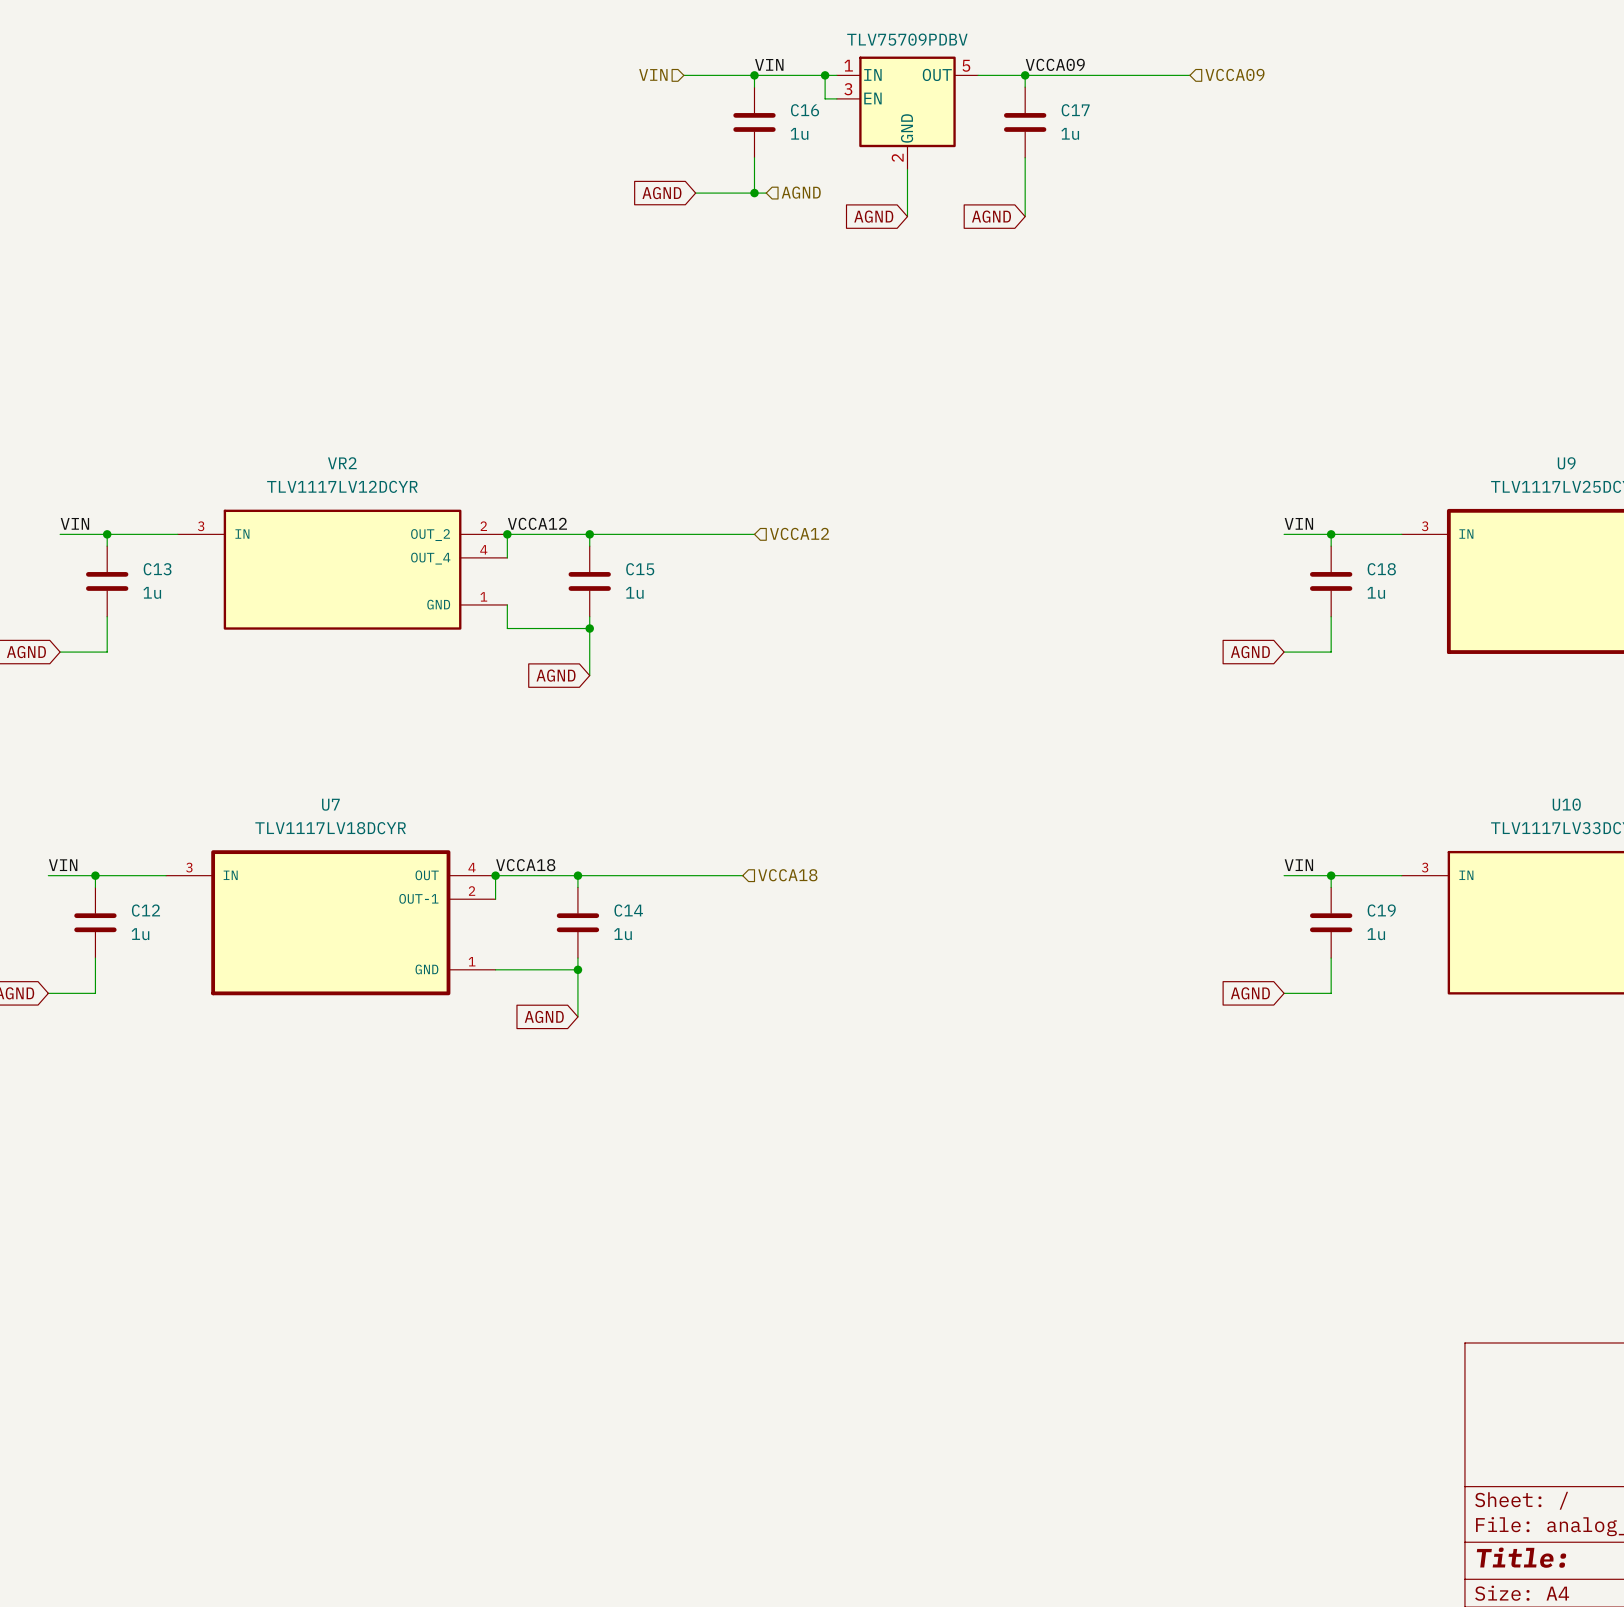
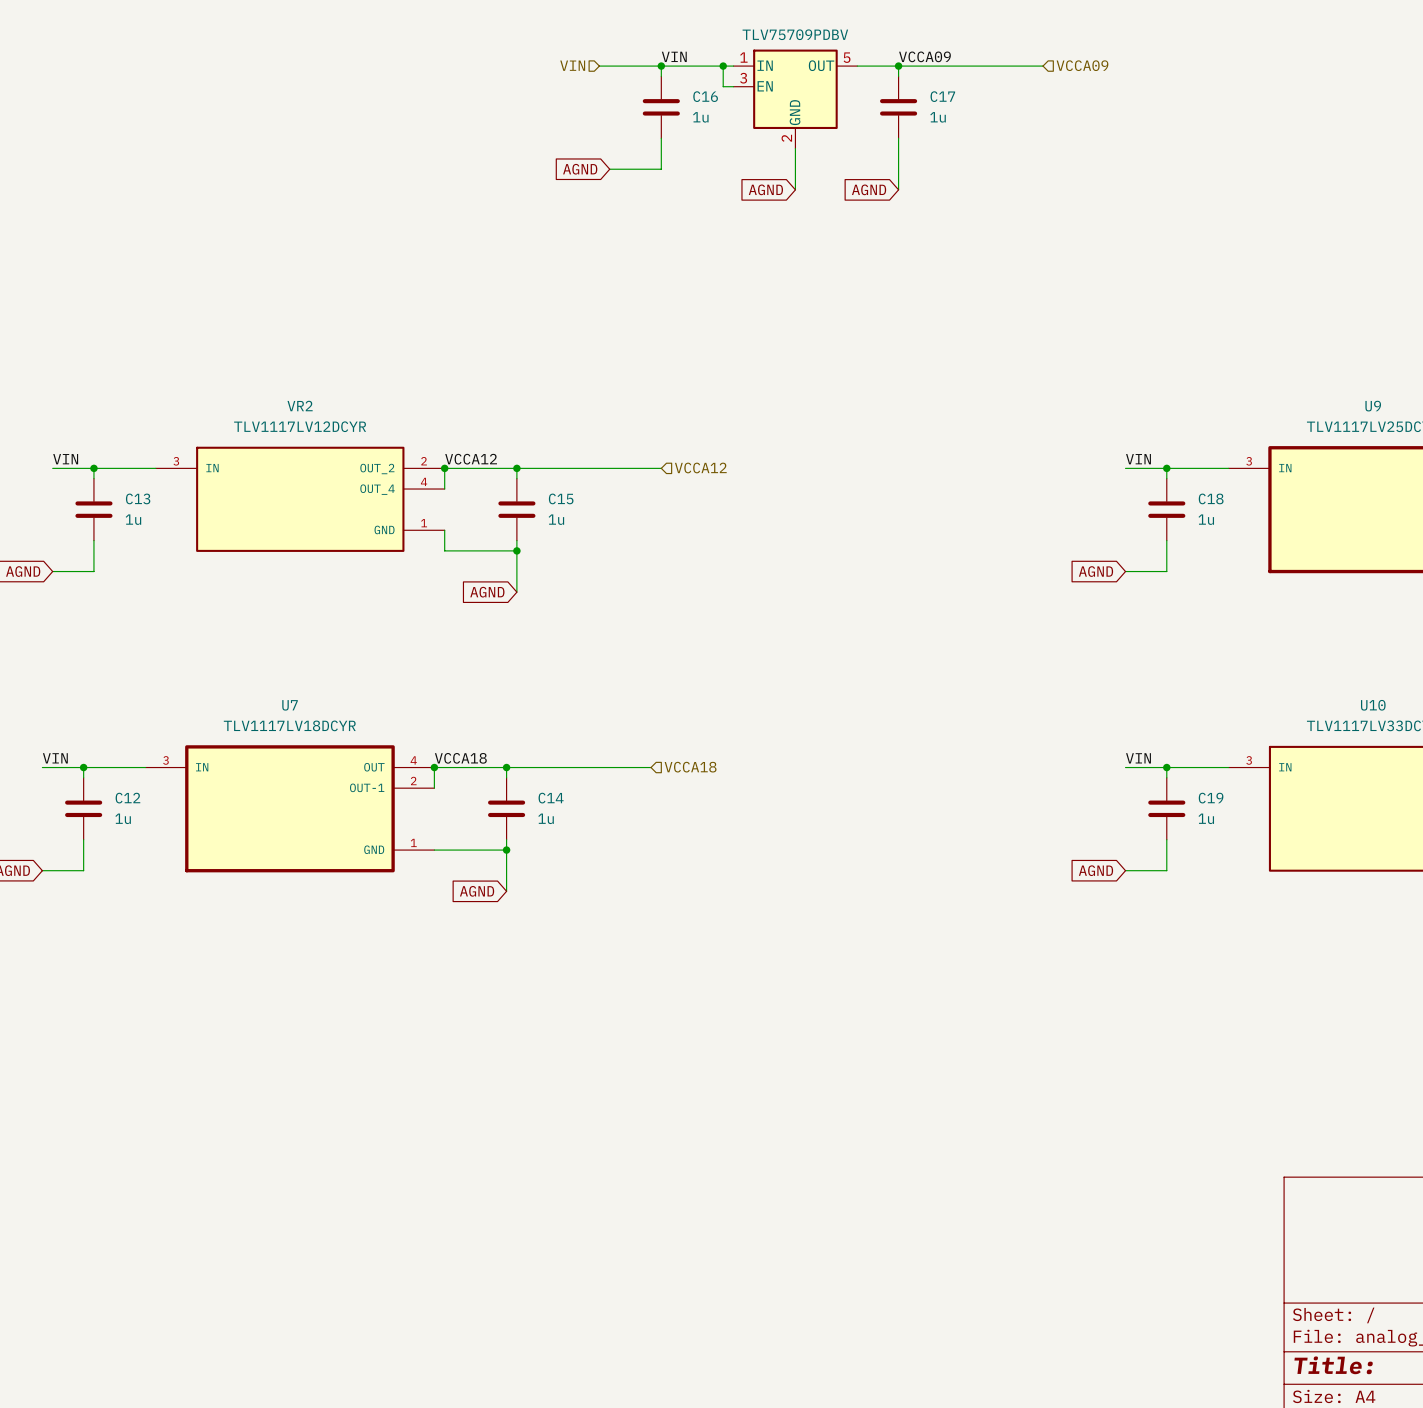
hierarchical label: AGND (801, 192) -> none
wire: (754, 193) (766, 193) -> none
junction: (754, 193) -> none

